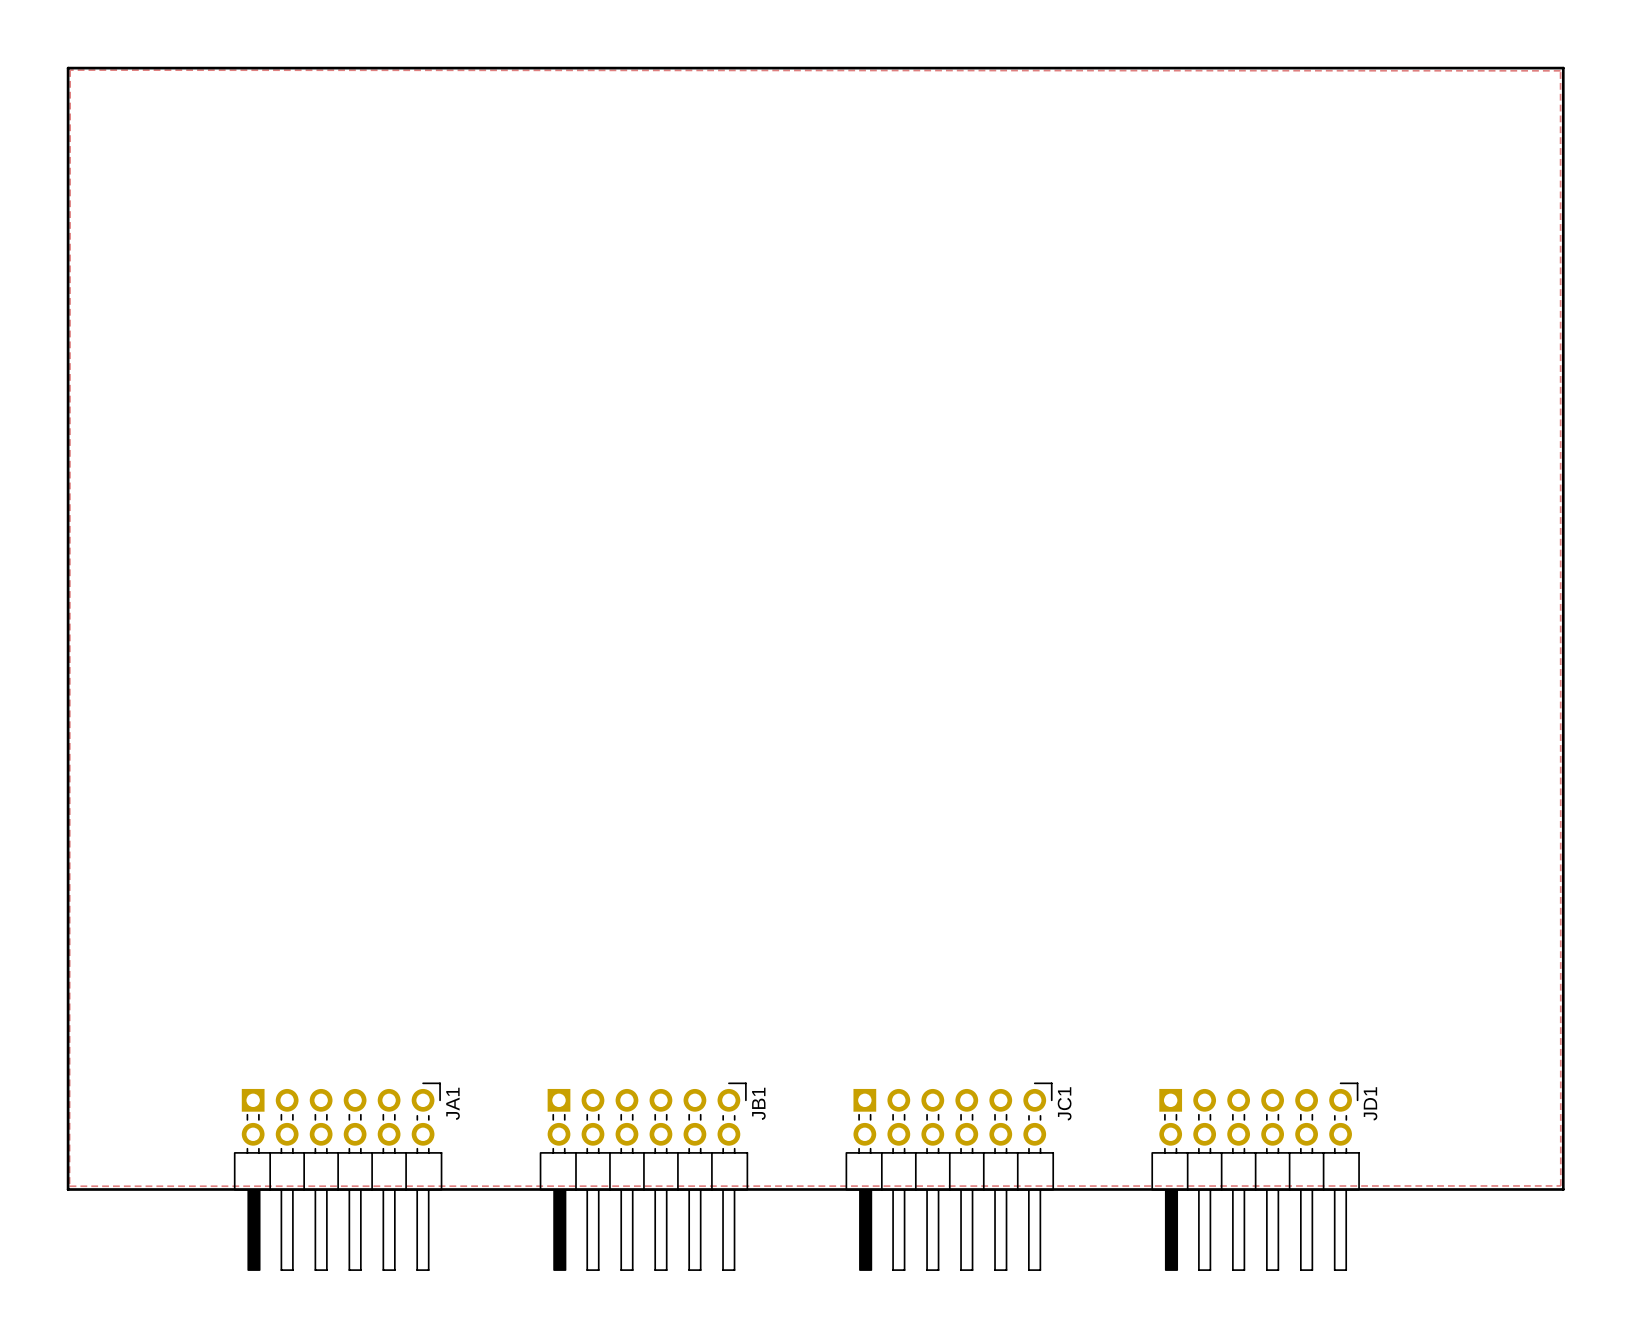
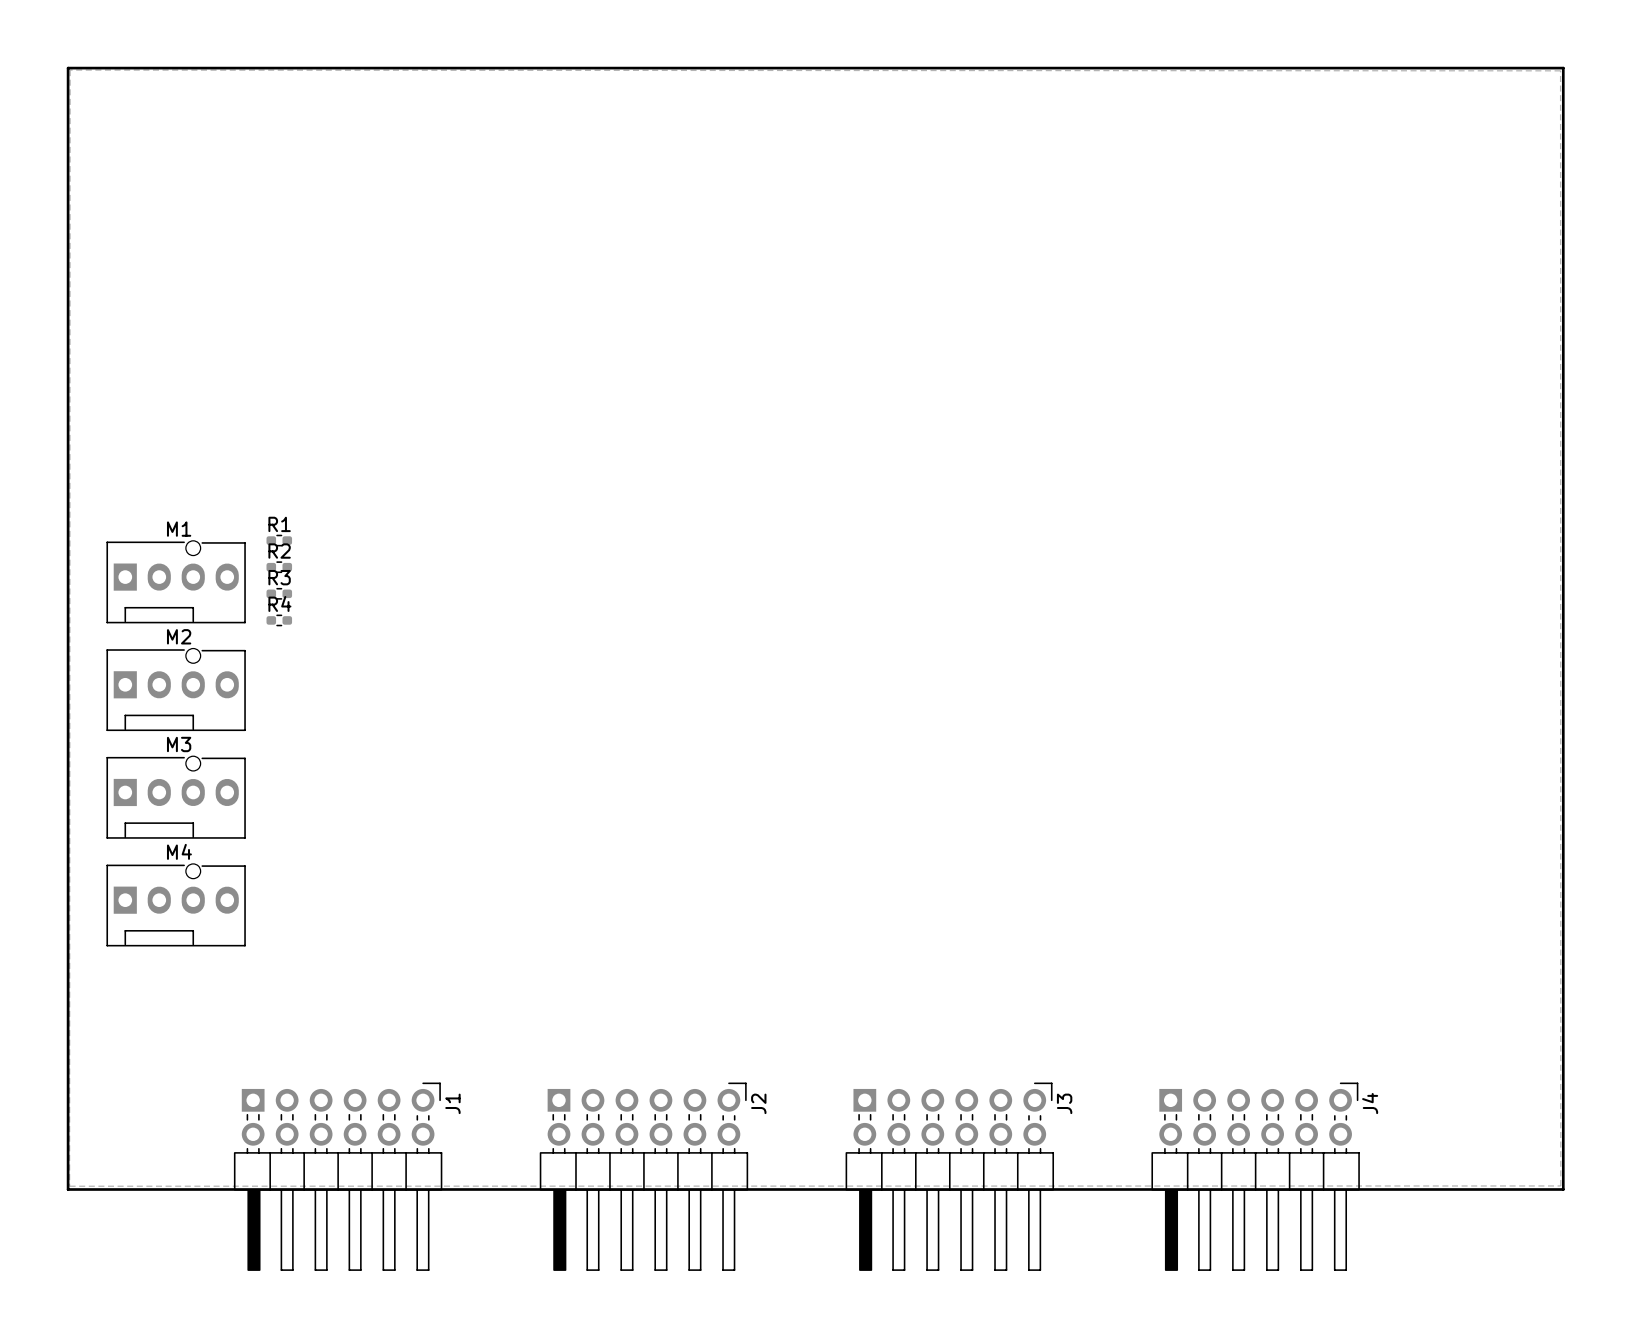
R1: none -> (279, 540)
R2: none -> (279, 567)
M1: none -> (176, 582)
R3: none -> (279, 593)
R4: none -> (279, 620)
M2: none -> (176, 689)
M3: none -> (176, 797)
M4: none -> (176, 905)
JA1 name: JA1 (453, 1103) -> J1 (452, 1103)
JB1 name: JB1 (758, 1103) -> J2 (758, 1103)
JC1 name: JC1 (1064, 1103) -> J3 (1064, 1103)
JD1 name: JD1 (1370, 1103) -> J4 (1370, 1103)

